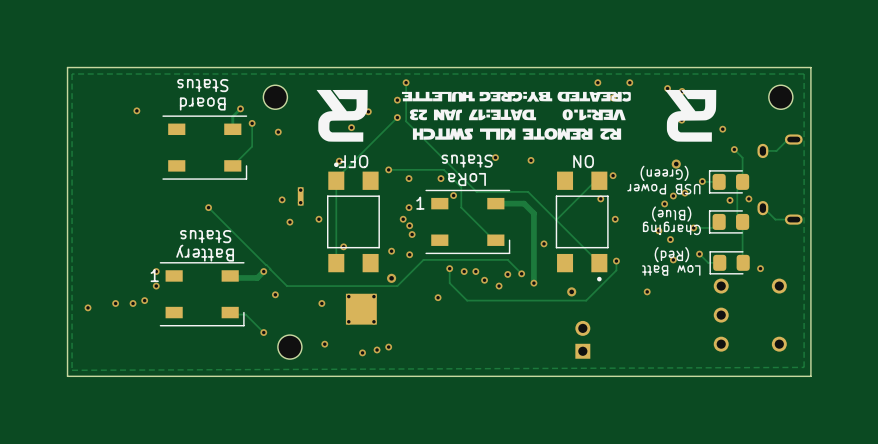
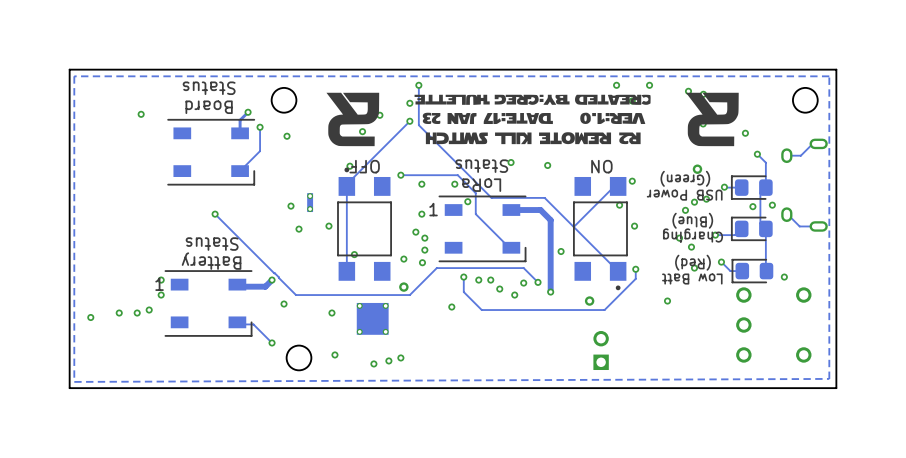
via: (403, 219) -> none
via: none -> (415, 232)
via: (409, 225) -> none
via: none -> (424, 238)
via: (412, 234) -> none
via: none -> (424, 250)

